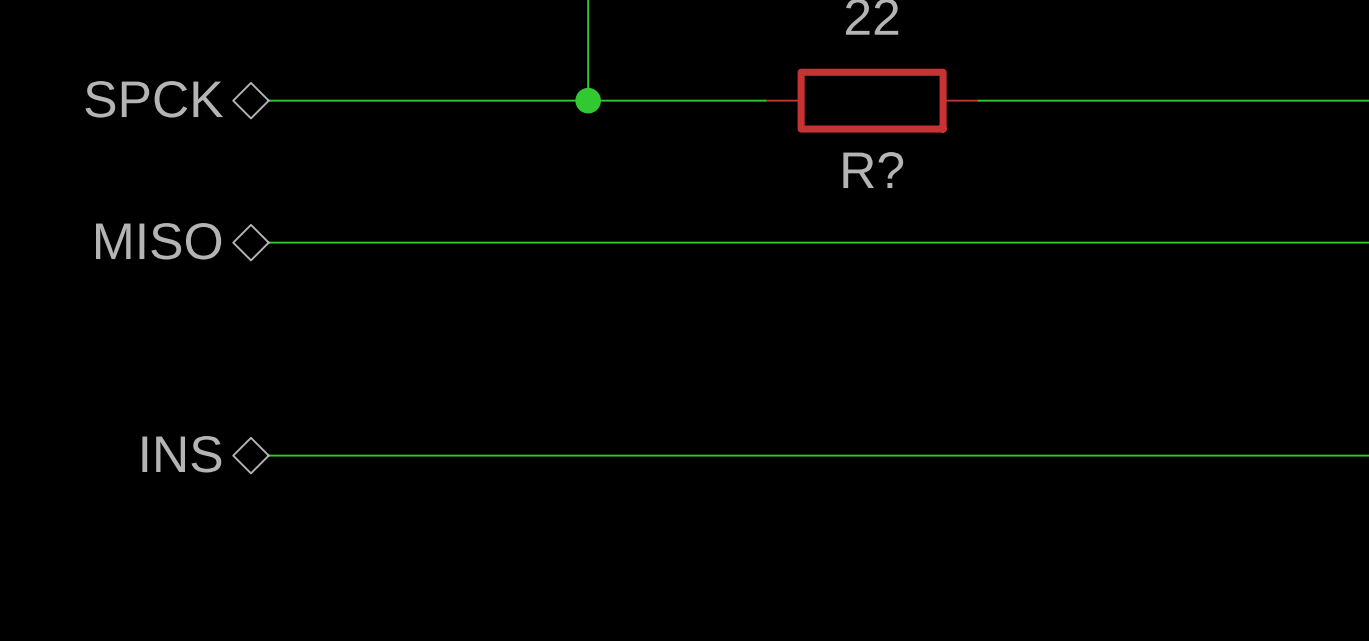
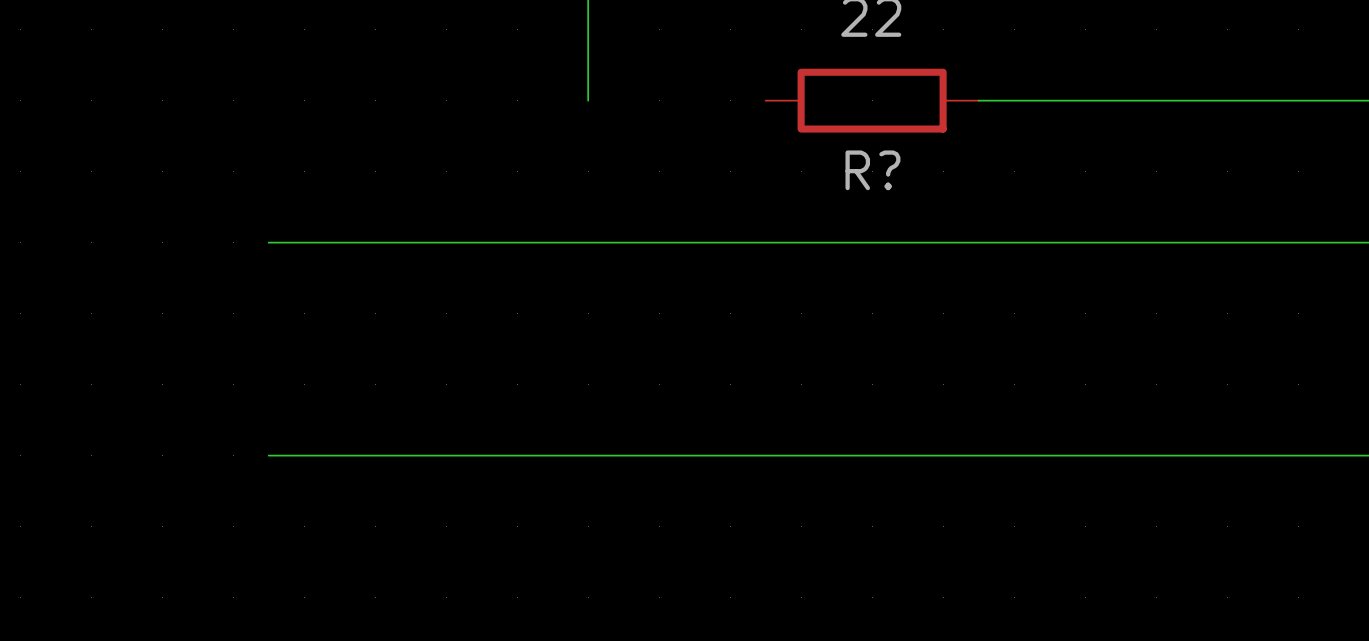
hierarchical label: SPCK (154, 99) -> none
wire: (268, 100) (765, 100) -> none
junction: (588, 100) -> none
hierarchical label: MISO (158, 241) -> none
hierarchical label: INS (181, 454) -> none

